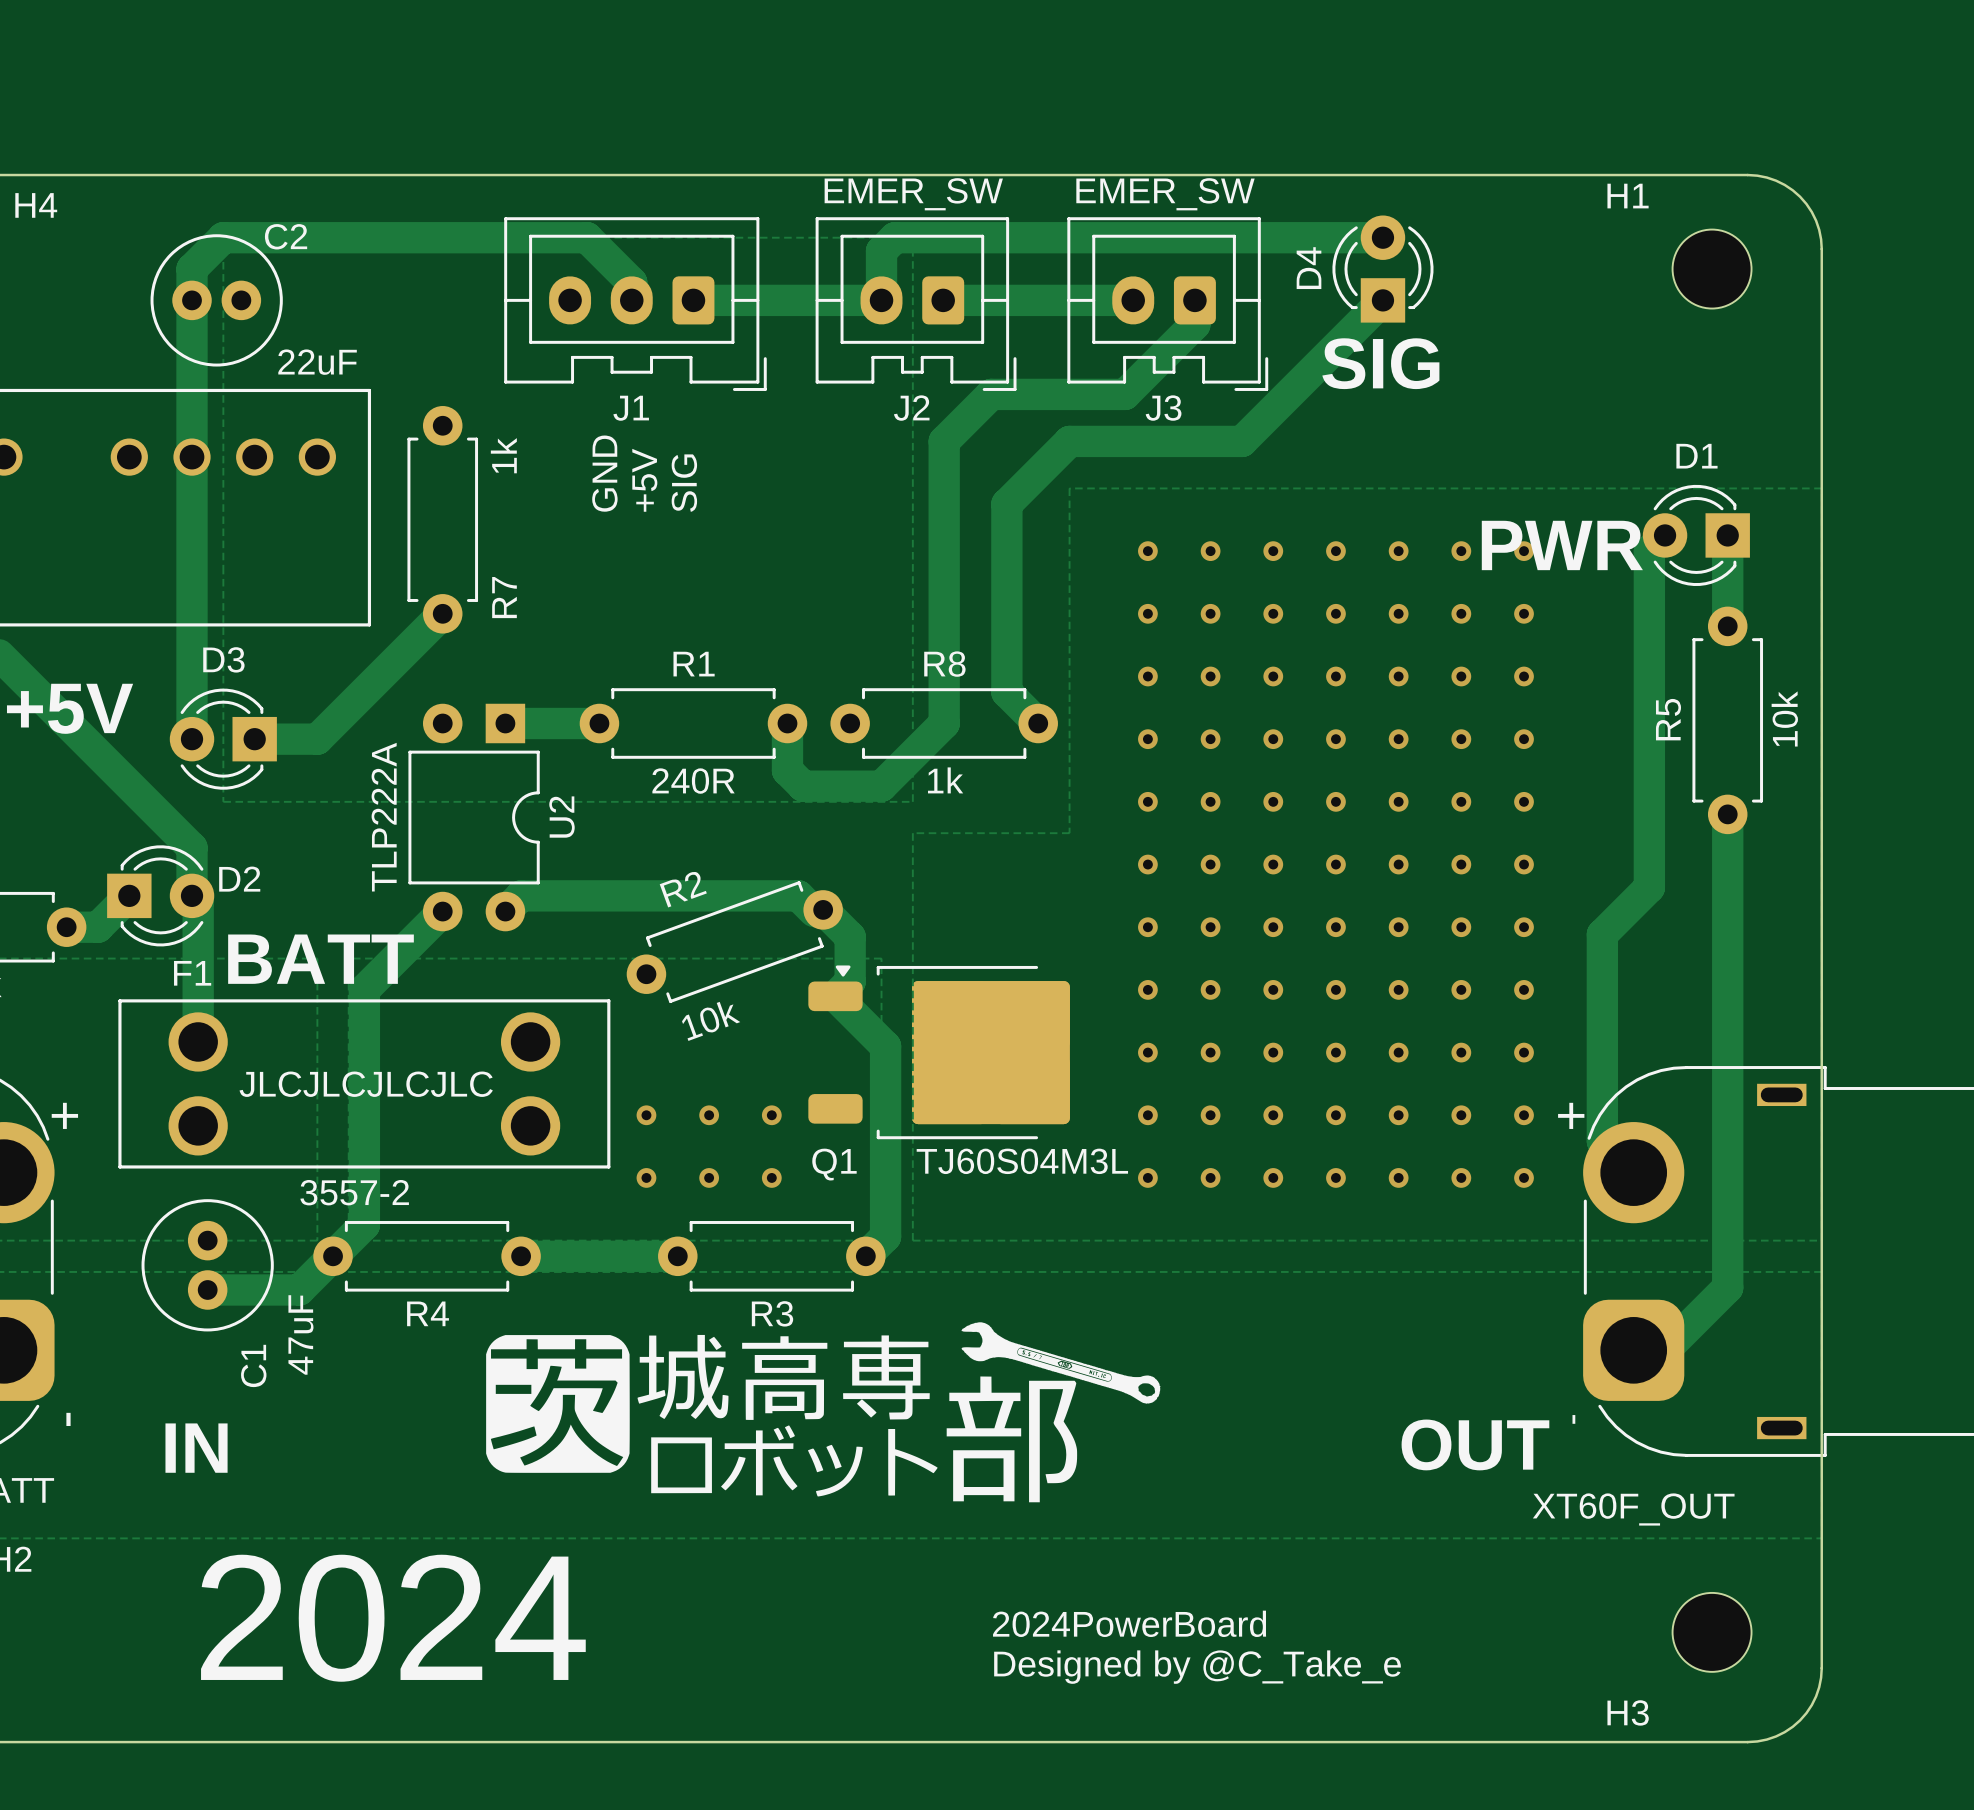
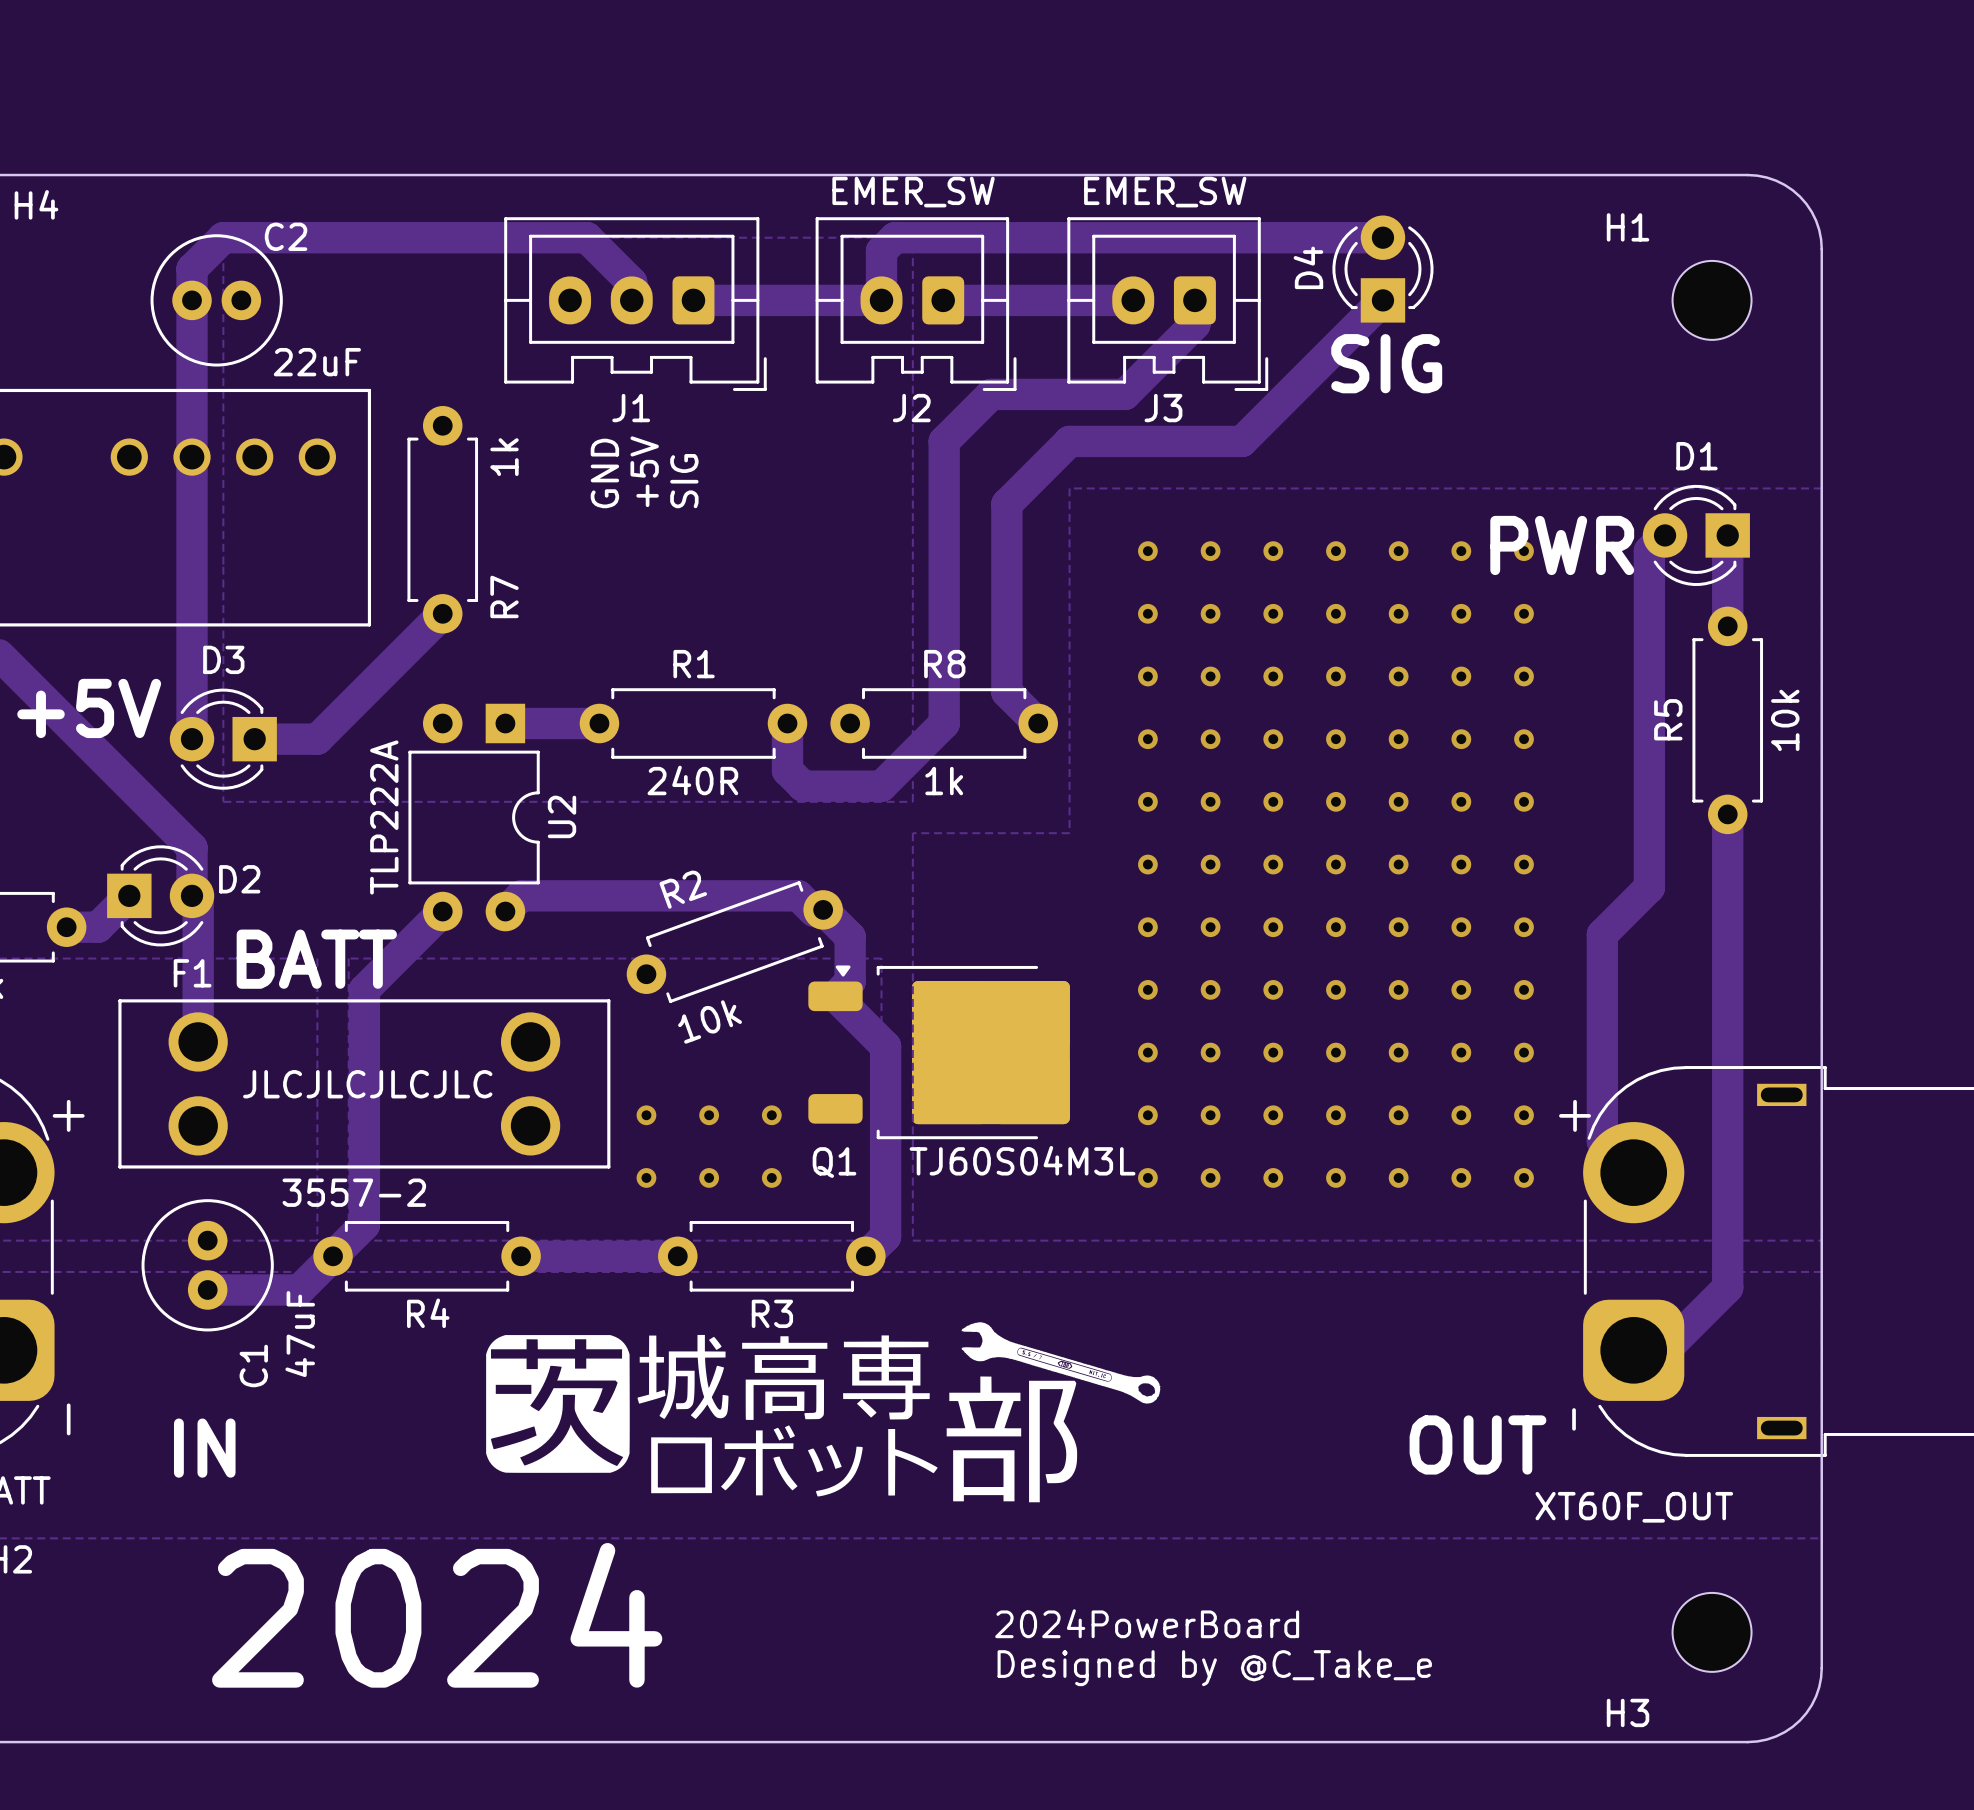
H1 position: (1712, 269) -> (1712, 300)

